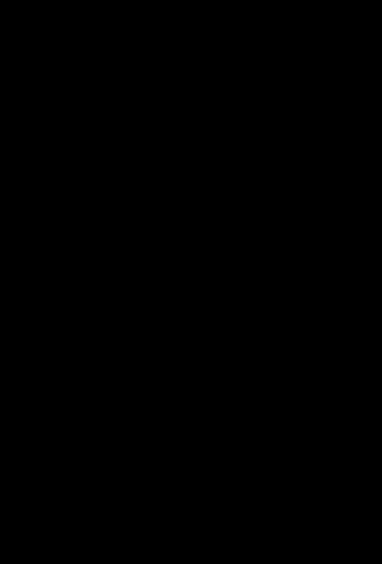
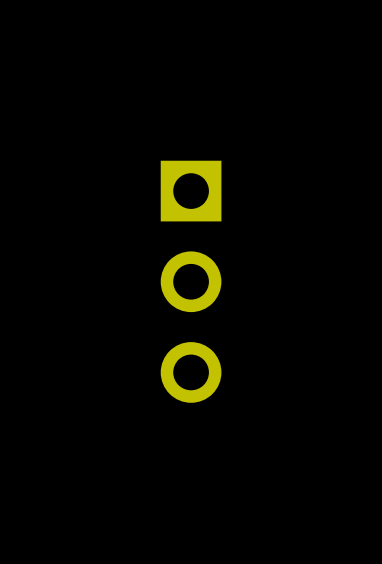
part: none -> (191, 281)

